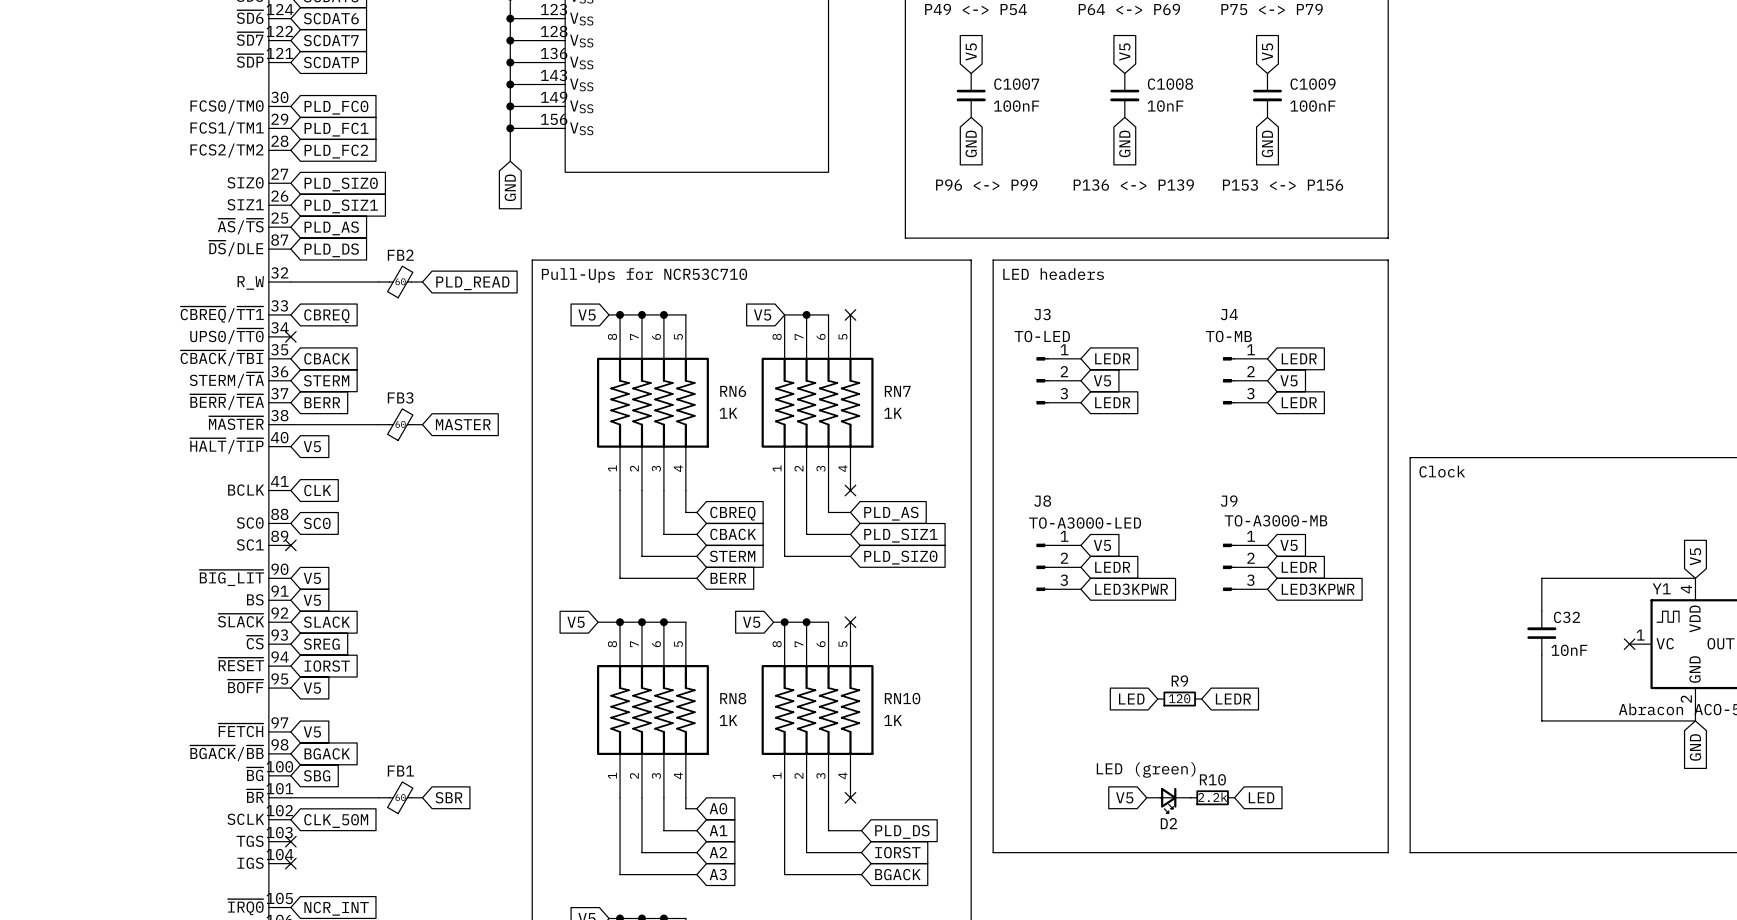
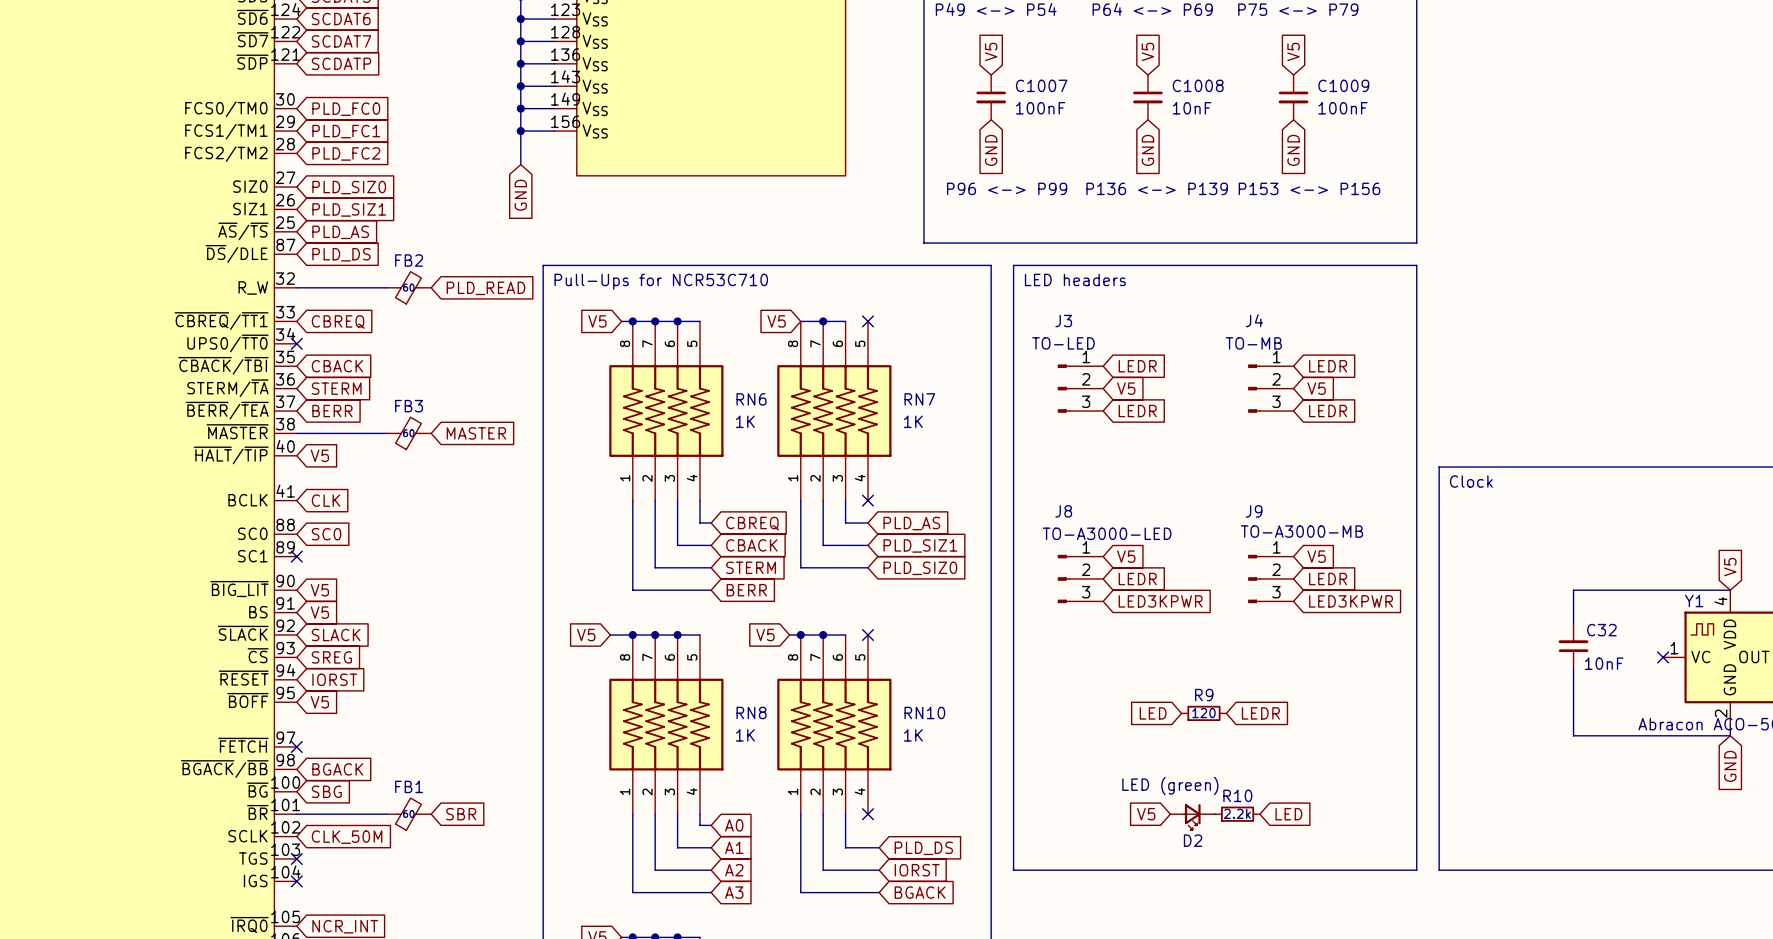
no-connect mark: none -> (296, 747)
global label: V5 (312, 732) -> none

